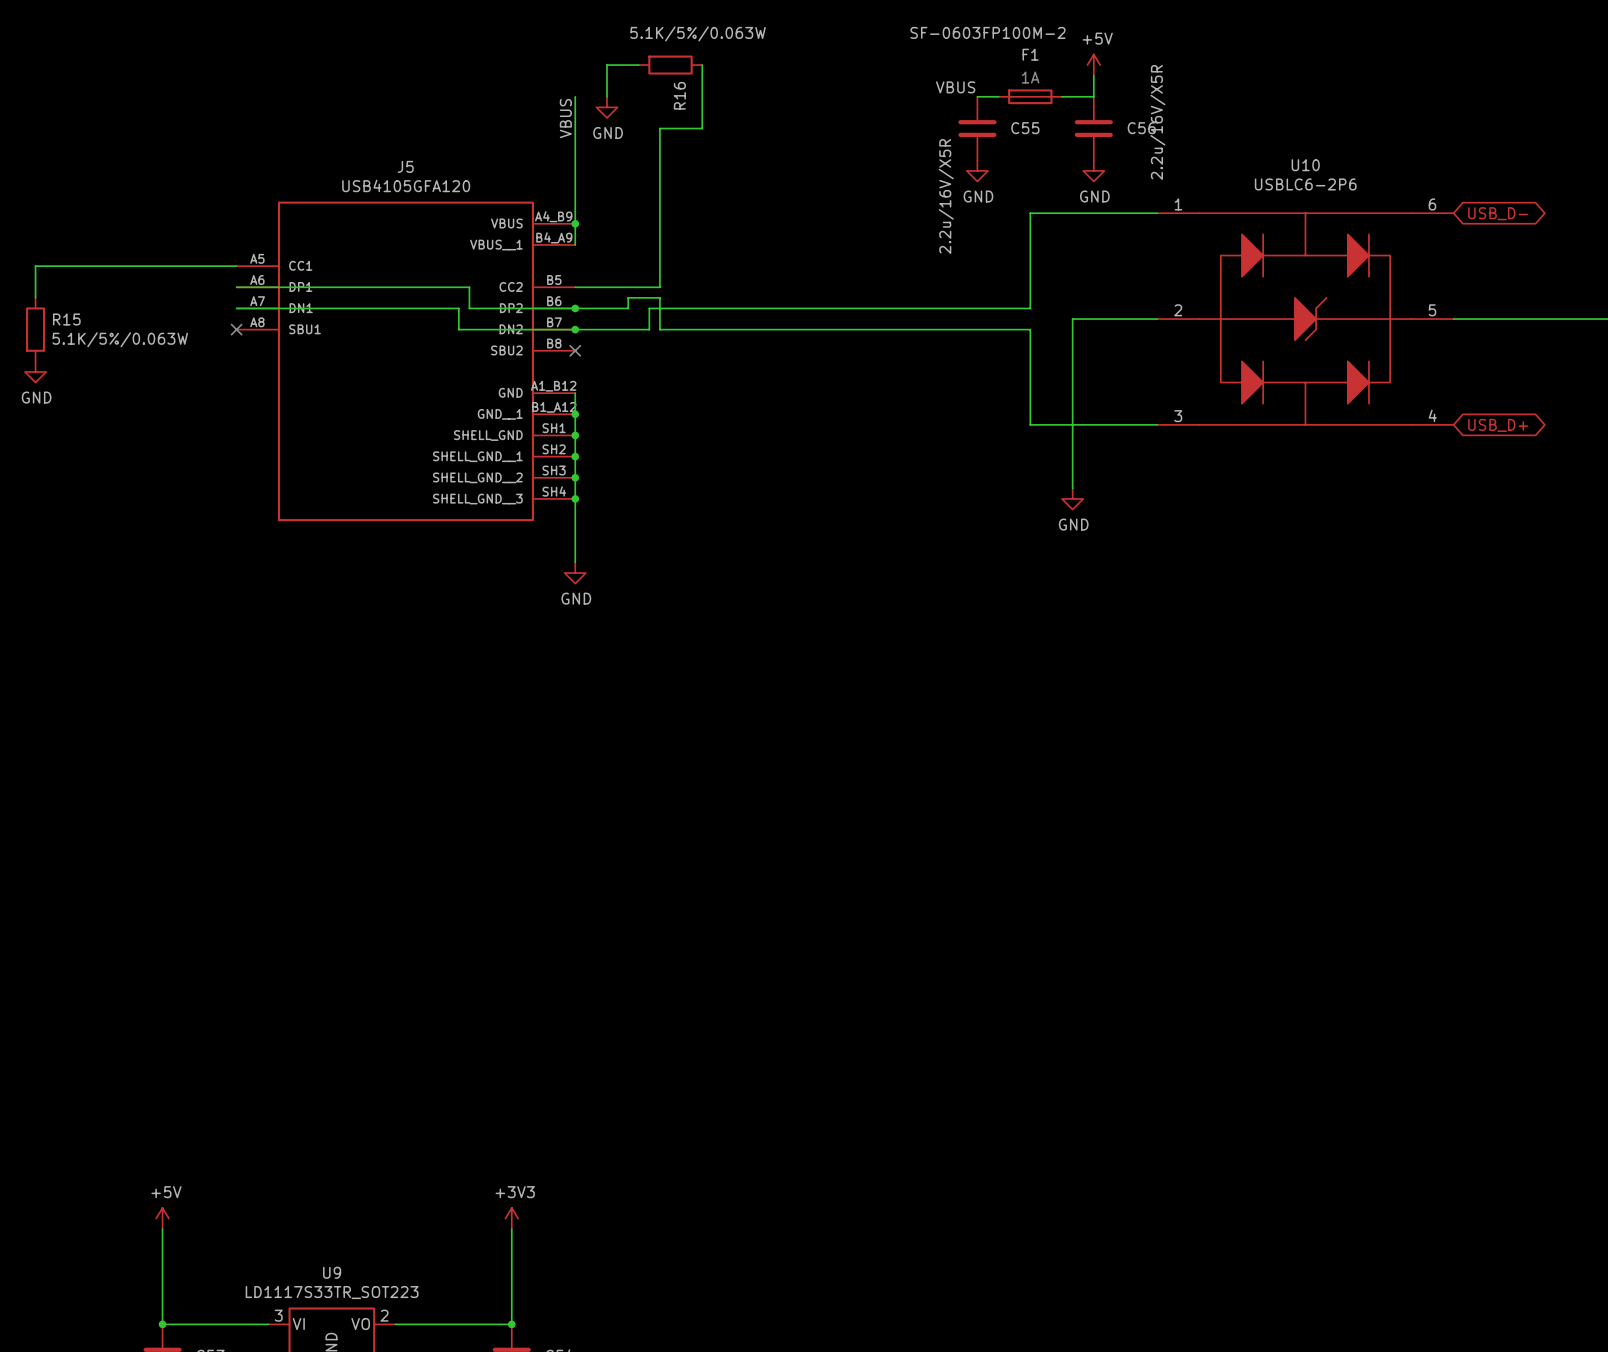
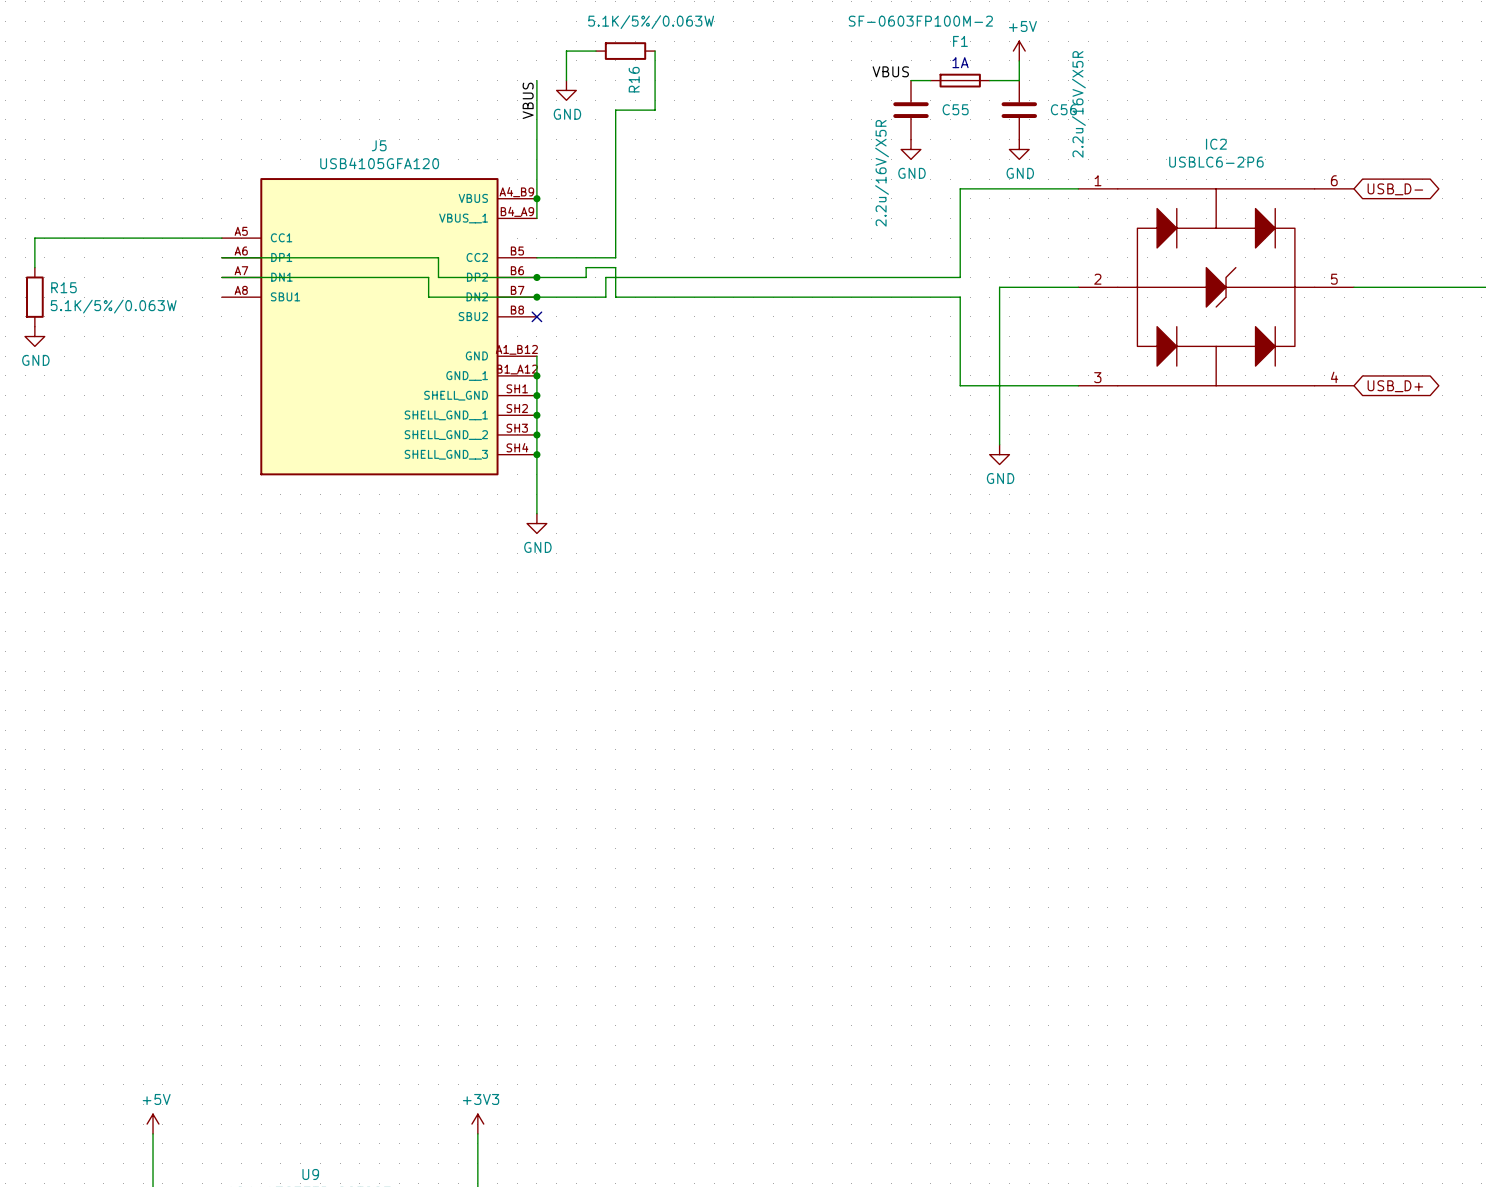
U10 name: U10 (1305, 165) -> IC2 (1216, 144)
no-connect mark: (236, 329) -> none

